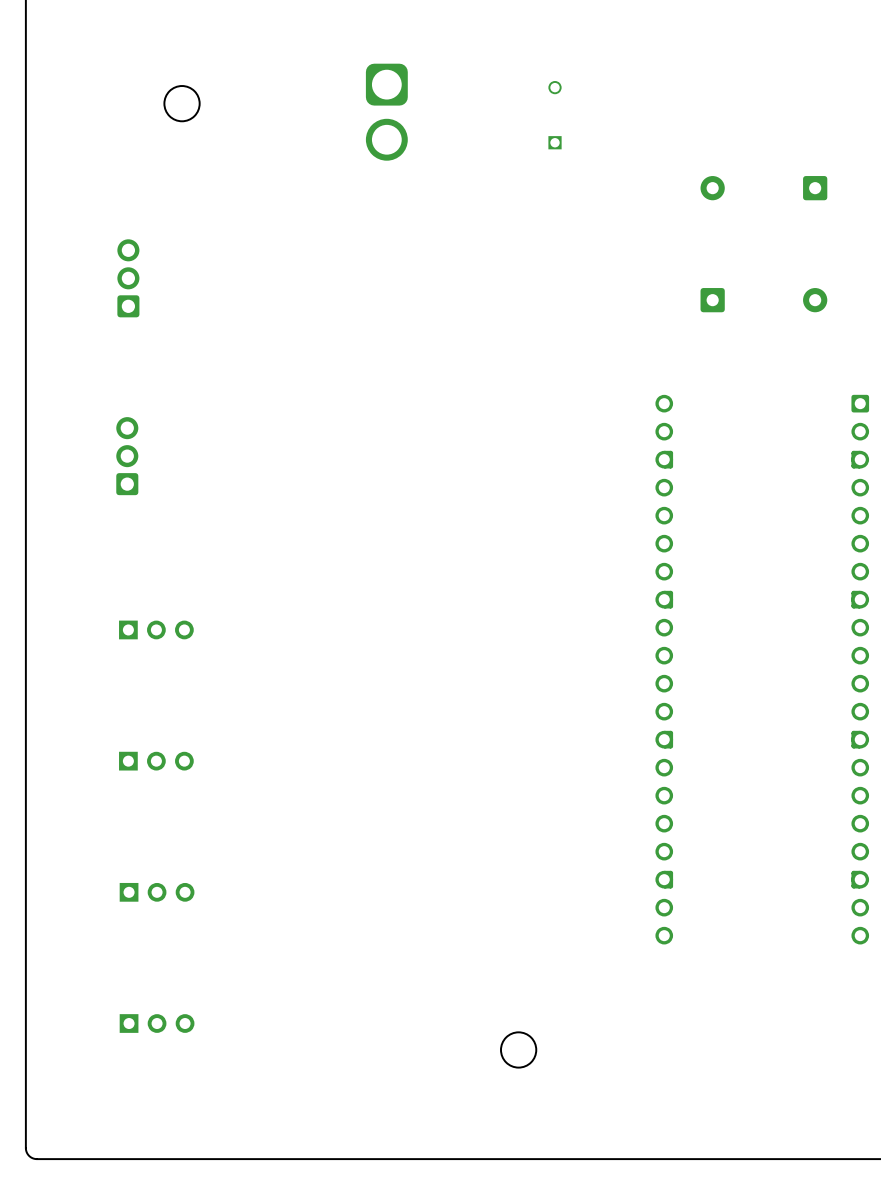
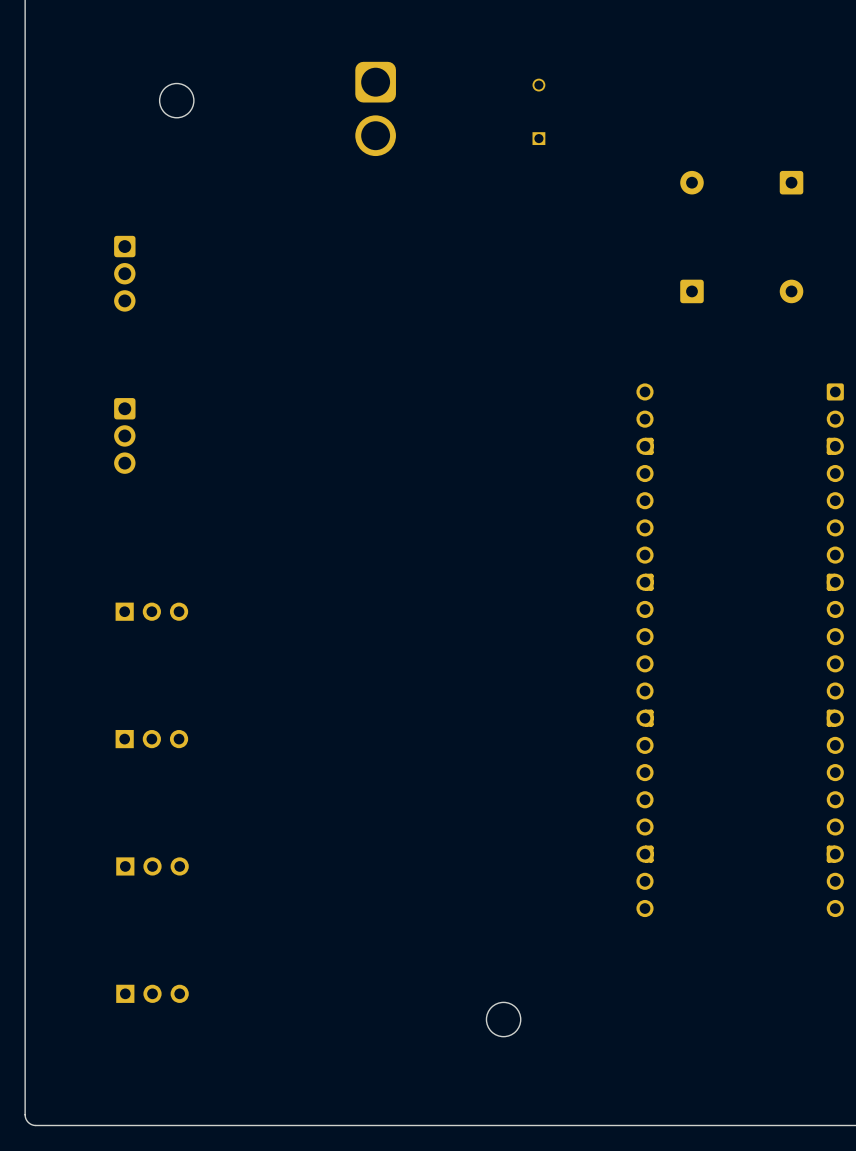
part rotation: 0° (128, 278) -> 180° (124, 273)
part rotation: 0° (127, 456) -> 180° (124, 435)

